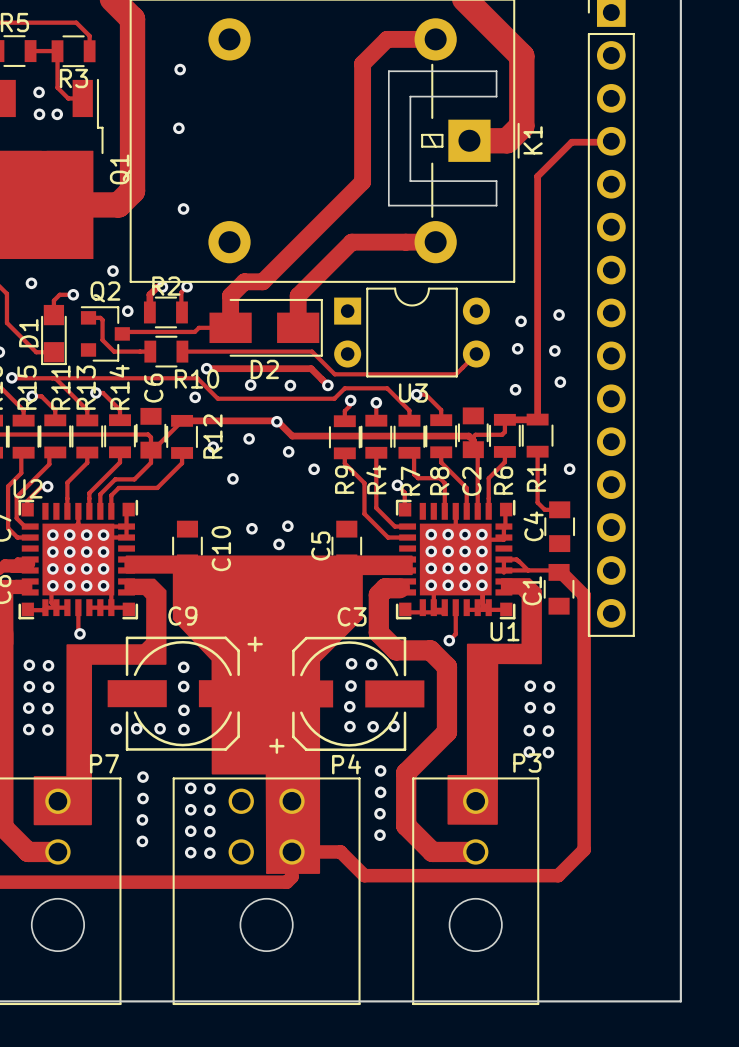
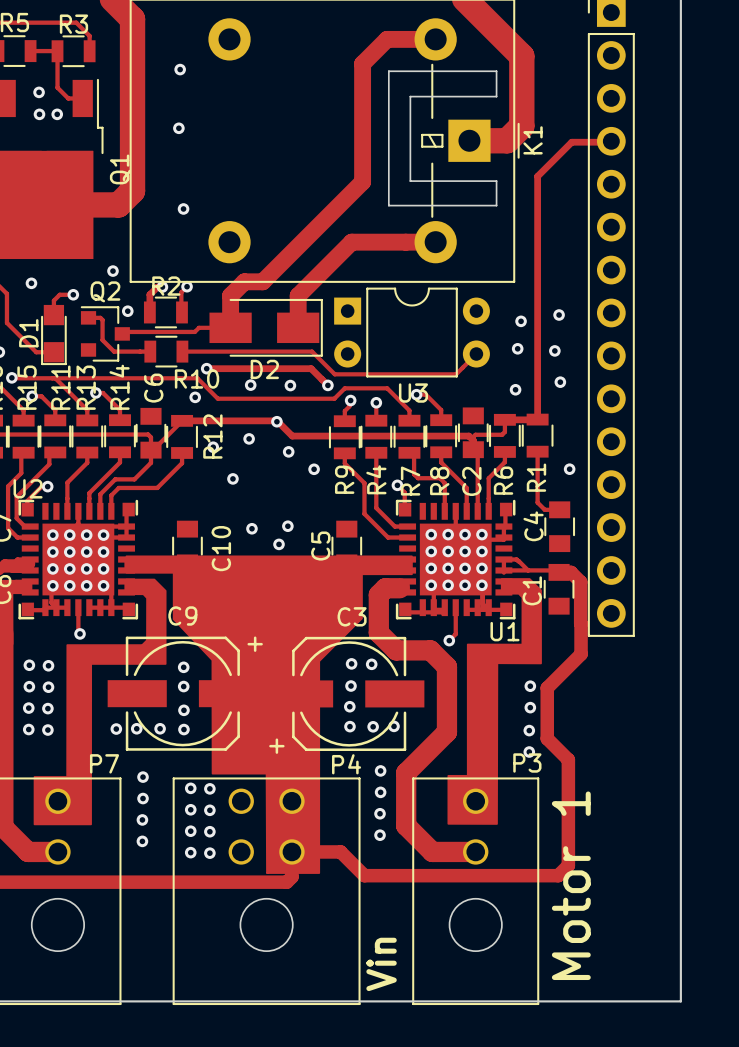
R3 name position: R3 (73, 78) -> R3 (73, 24)
track: (561, 572) (584, 595) (584, 849) (568, 865) -> (561, 572) (571, 572) (580, 582) (581, 654) (547, 688) (547, 738) (568, 759) (568, 865)
via: (549, 686) -> none
via: (549, 708) -> none
via: (548, 731) -> none
via: (548, 752) -> none
text: none -> Motor 1 (571, 885)
text: none -> Vin (381, 964)

